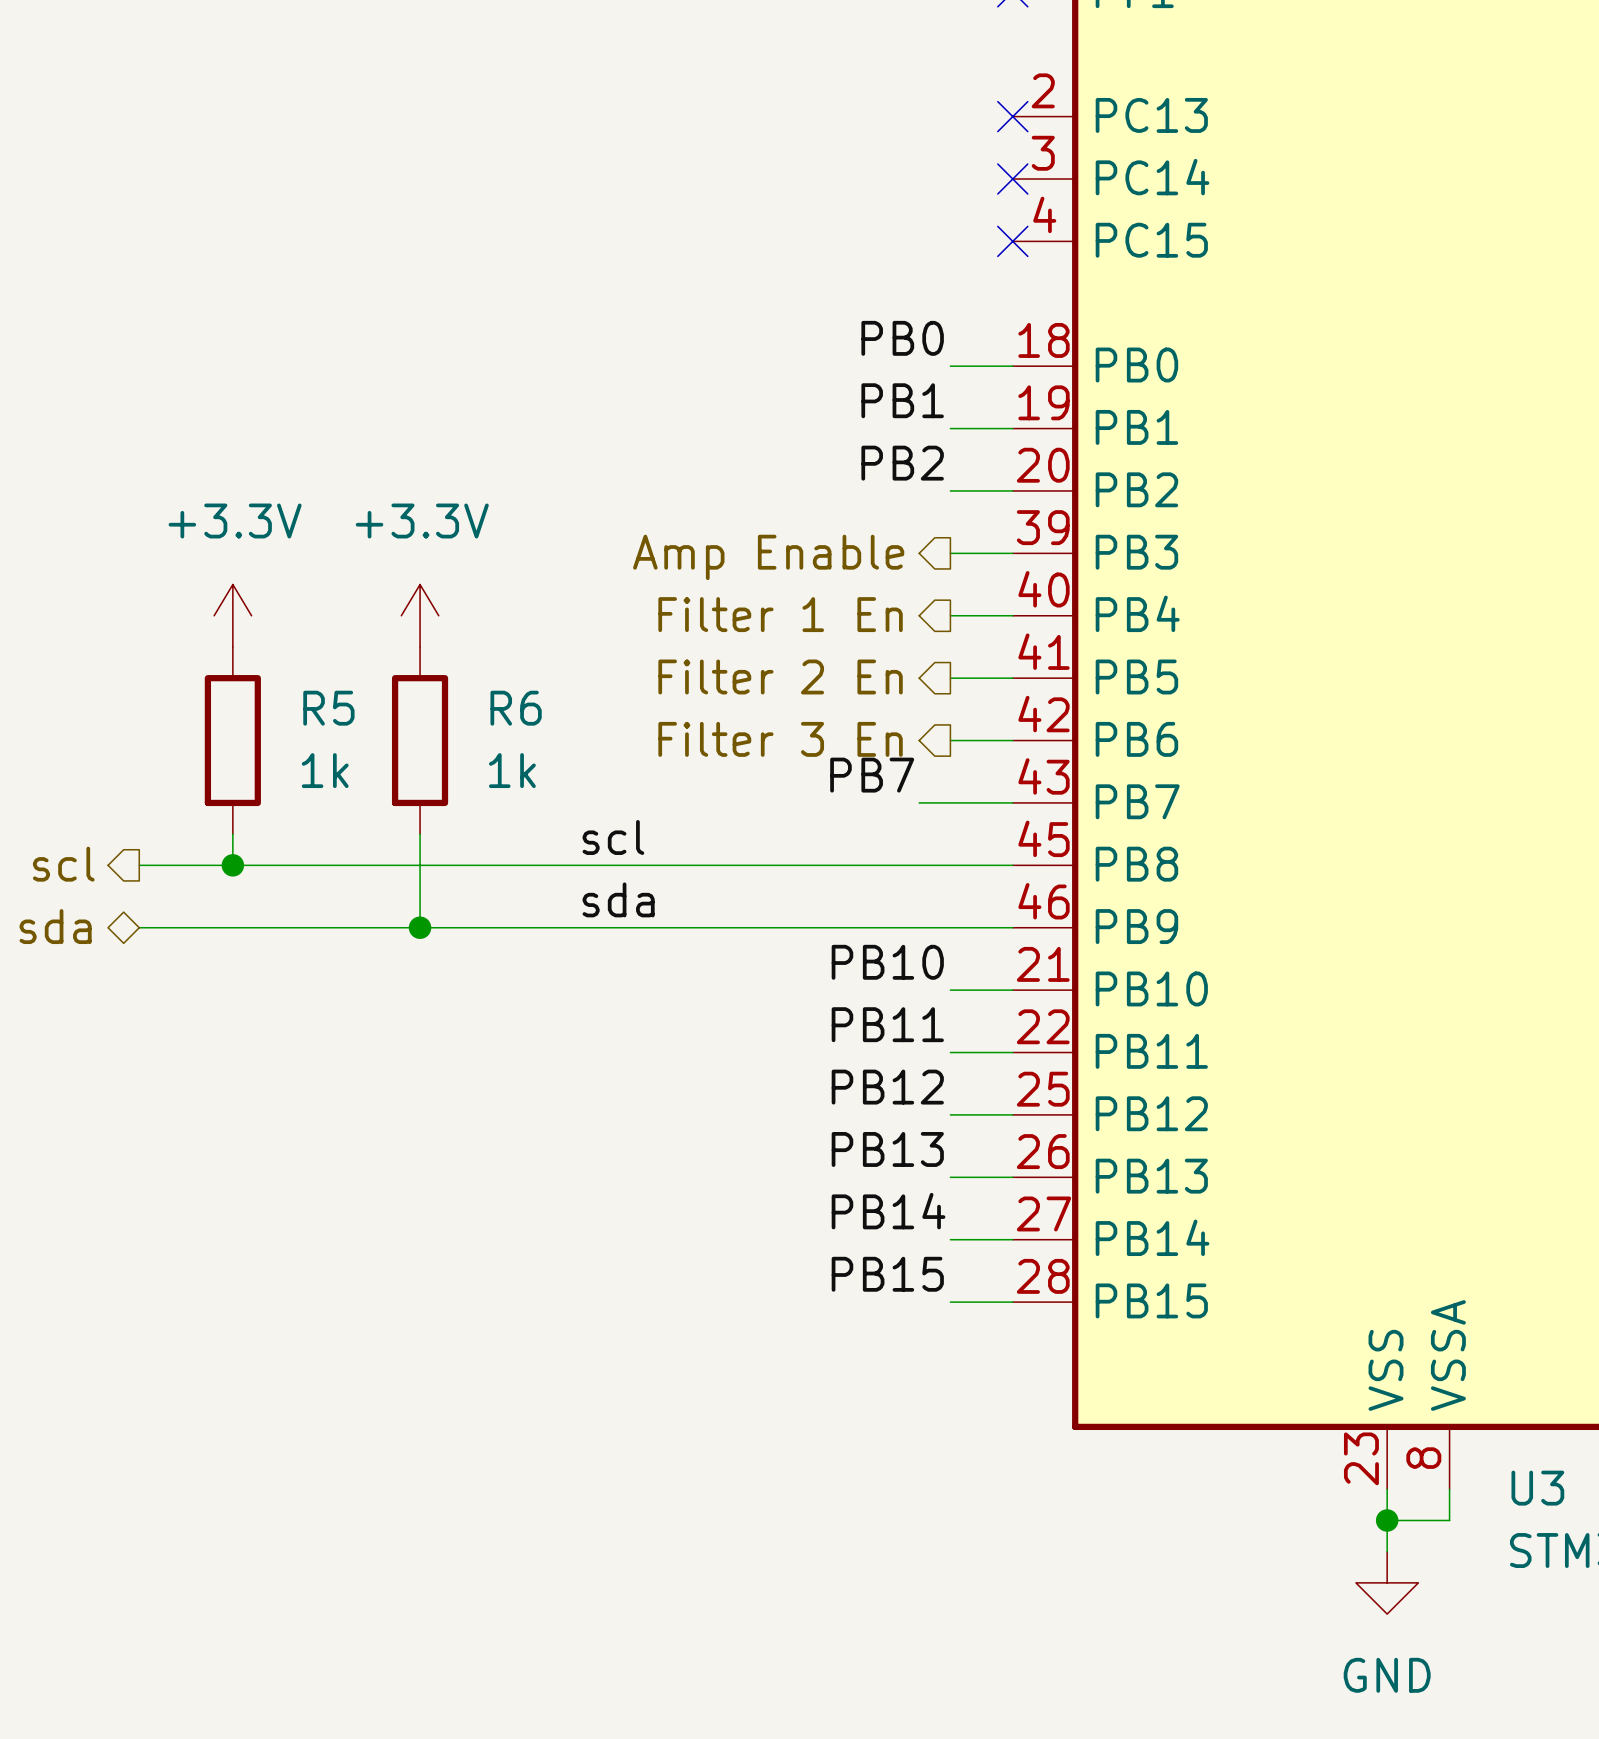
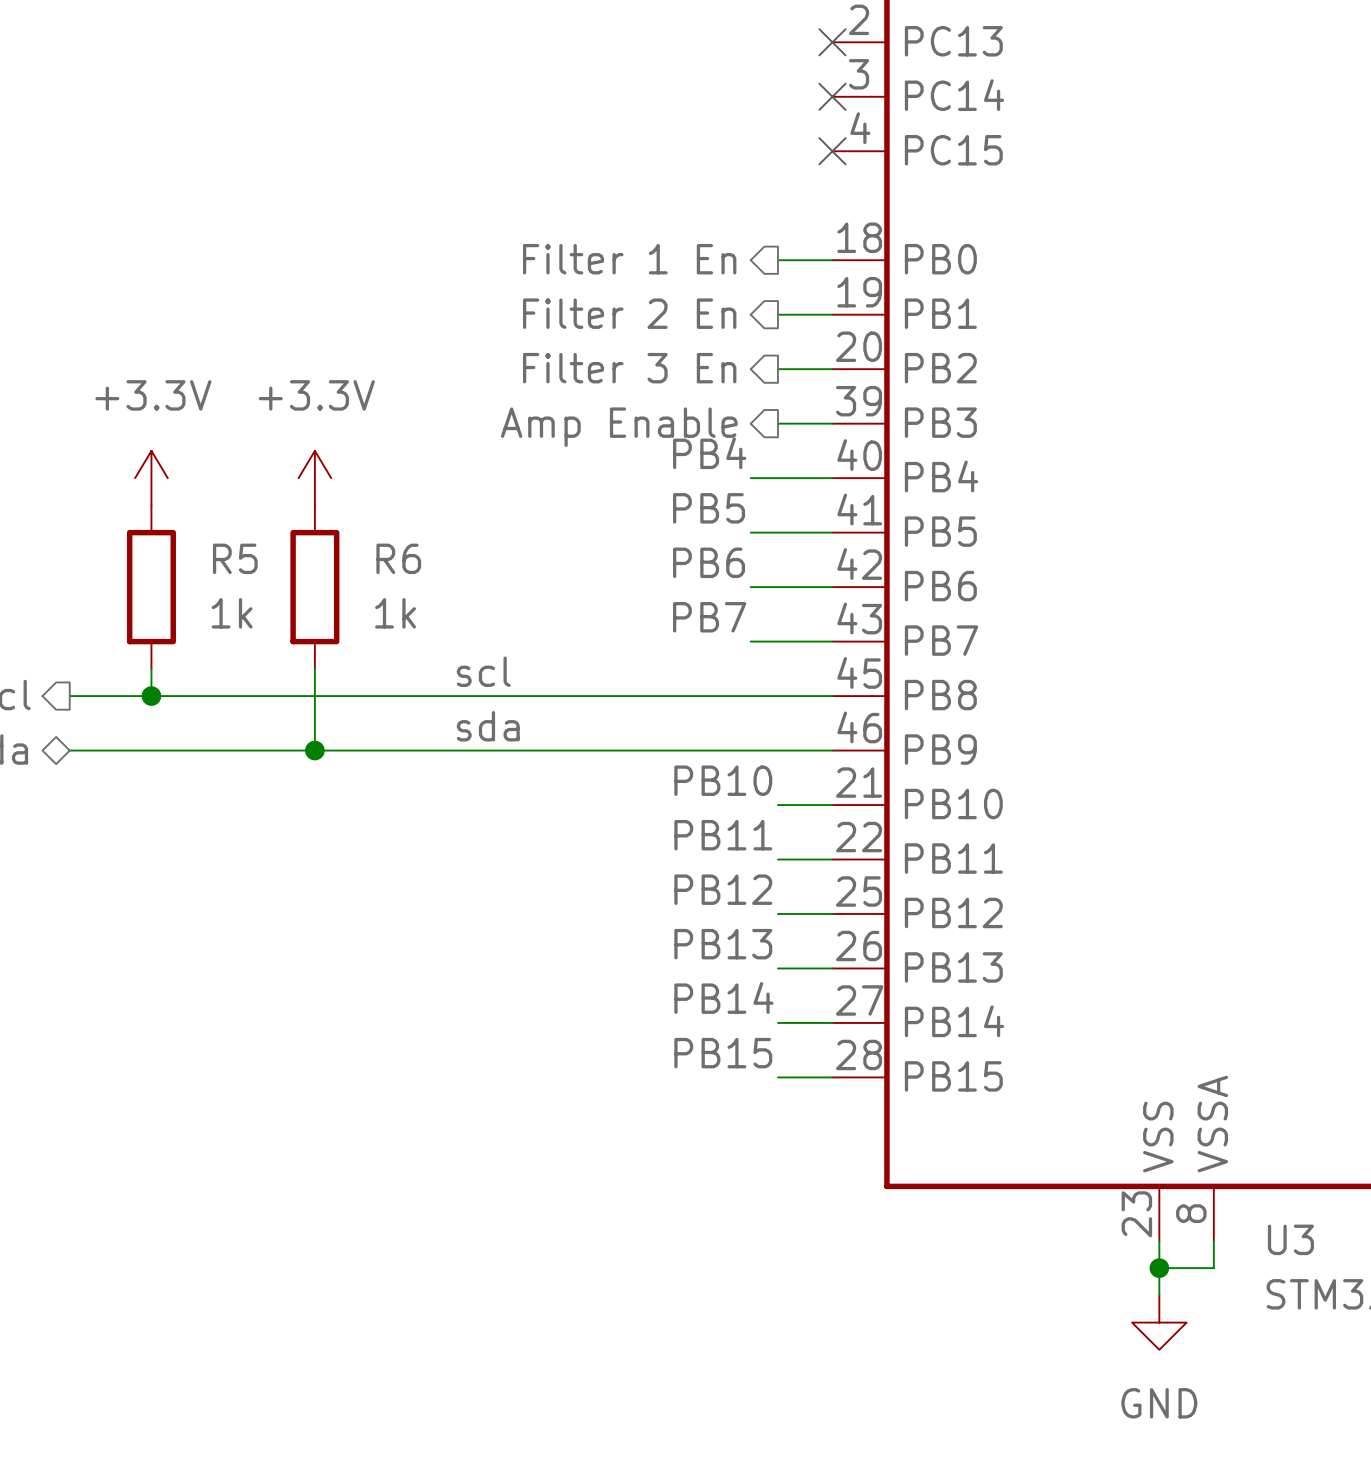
label: PB0 (902, 338) -> none
label: PB1 (902, 400) -> none
label: PB2 (902, 463) -> none
label: none -> PB4 (709, 453)
hierarchical label position: Filter 1 En (780, 614) -> Filter 1 En (629, 259)
wire: none -> (750, 478) (777, 478)
label: none -> PB5 (709, 508)
hierarchical label position: Filter 2 En (780, 676) -> Filter 2 En (629, 313)
wire: none -> (750, 532) (777, 532)
label: none -> PB6 (709, 562)
hierarchical label position: Filter 3 En (780, 739) -> Filter 3 En (629, 368)
wire: none -> (750, 587) (777, 587)

